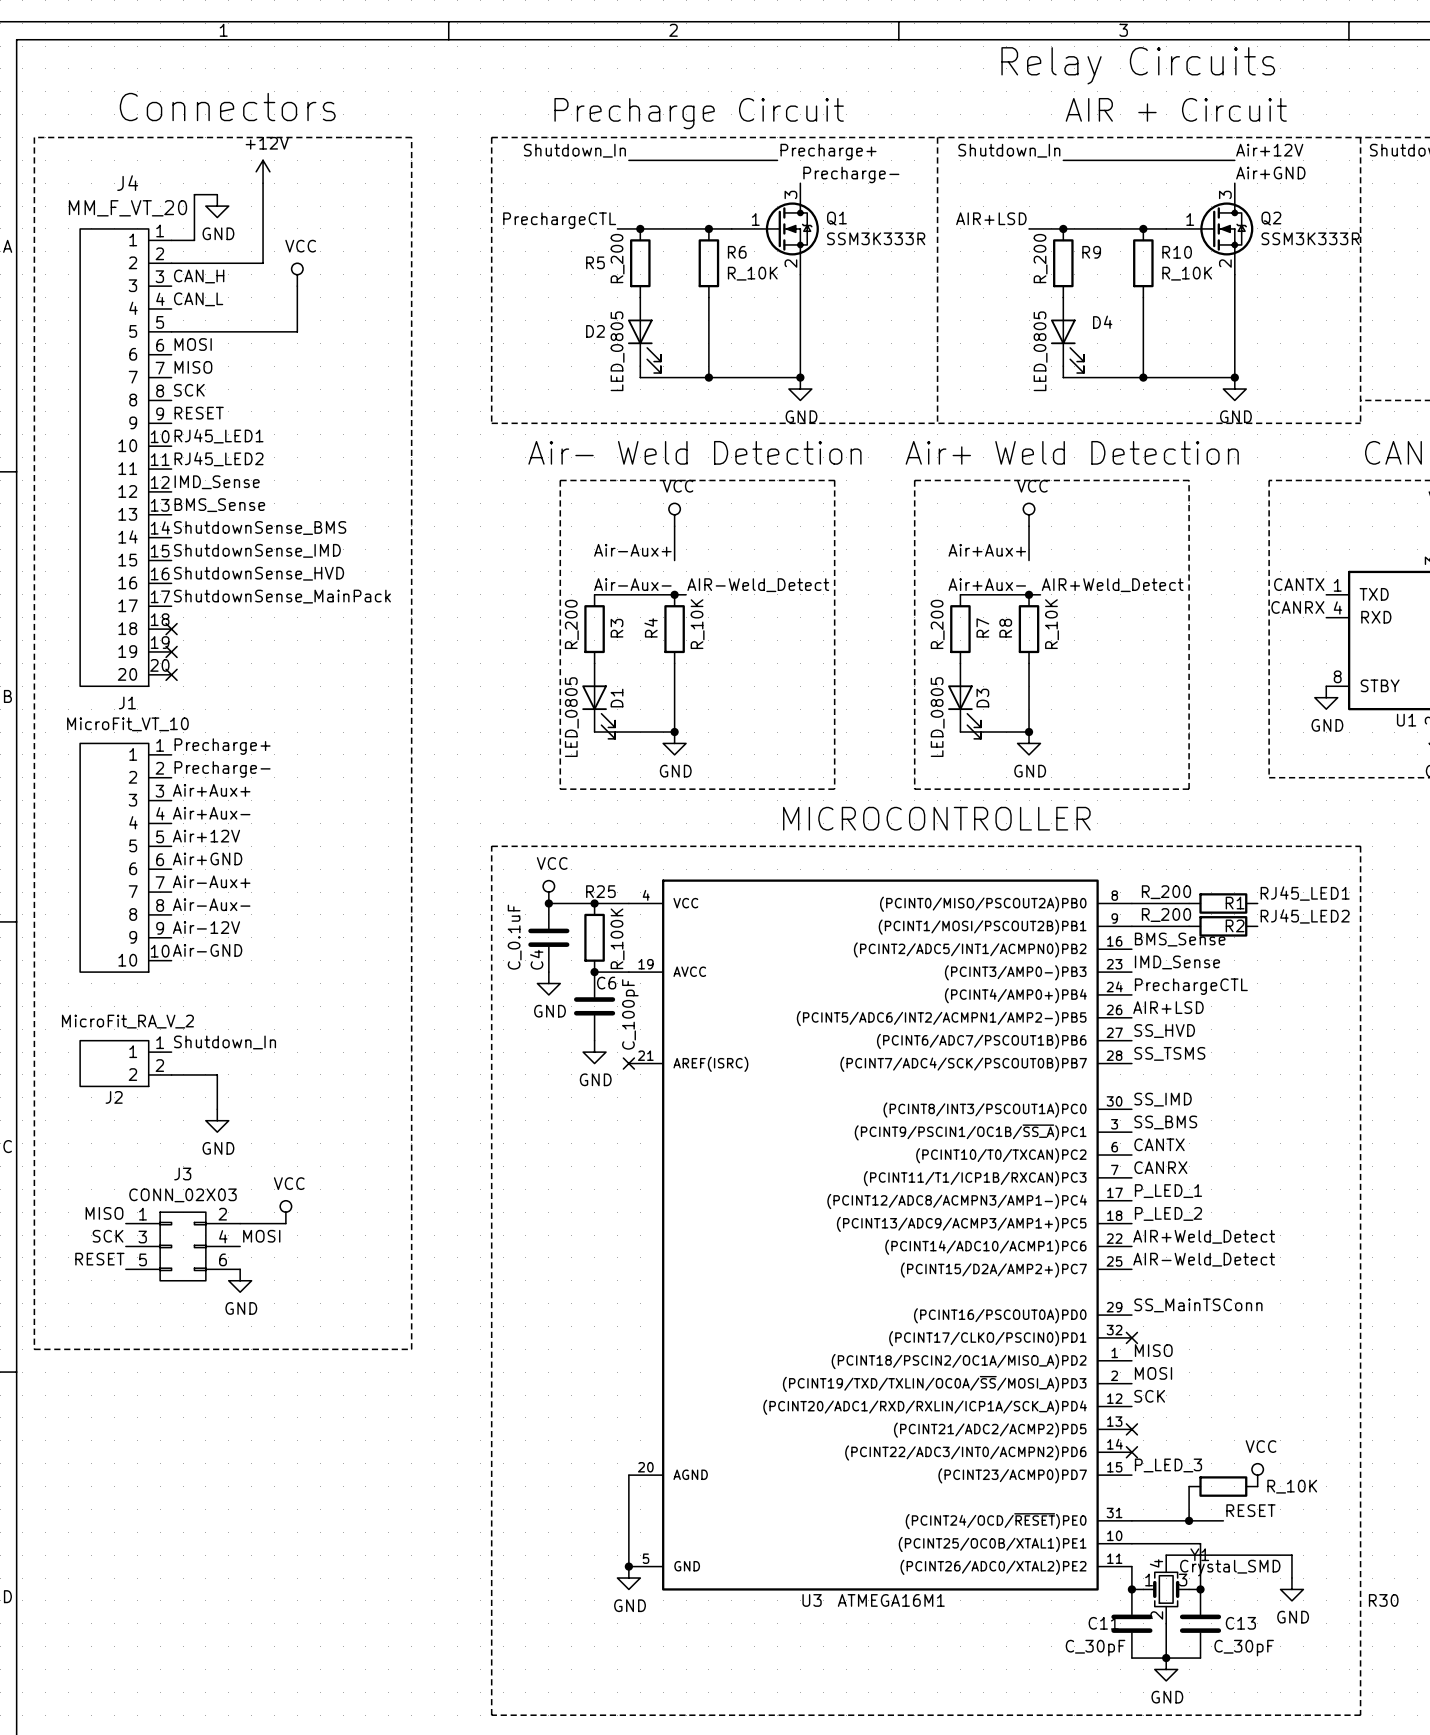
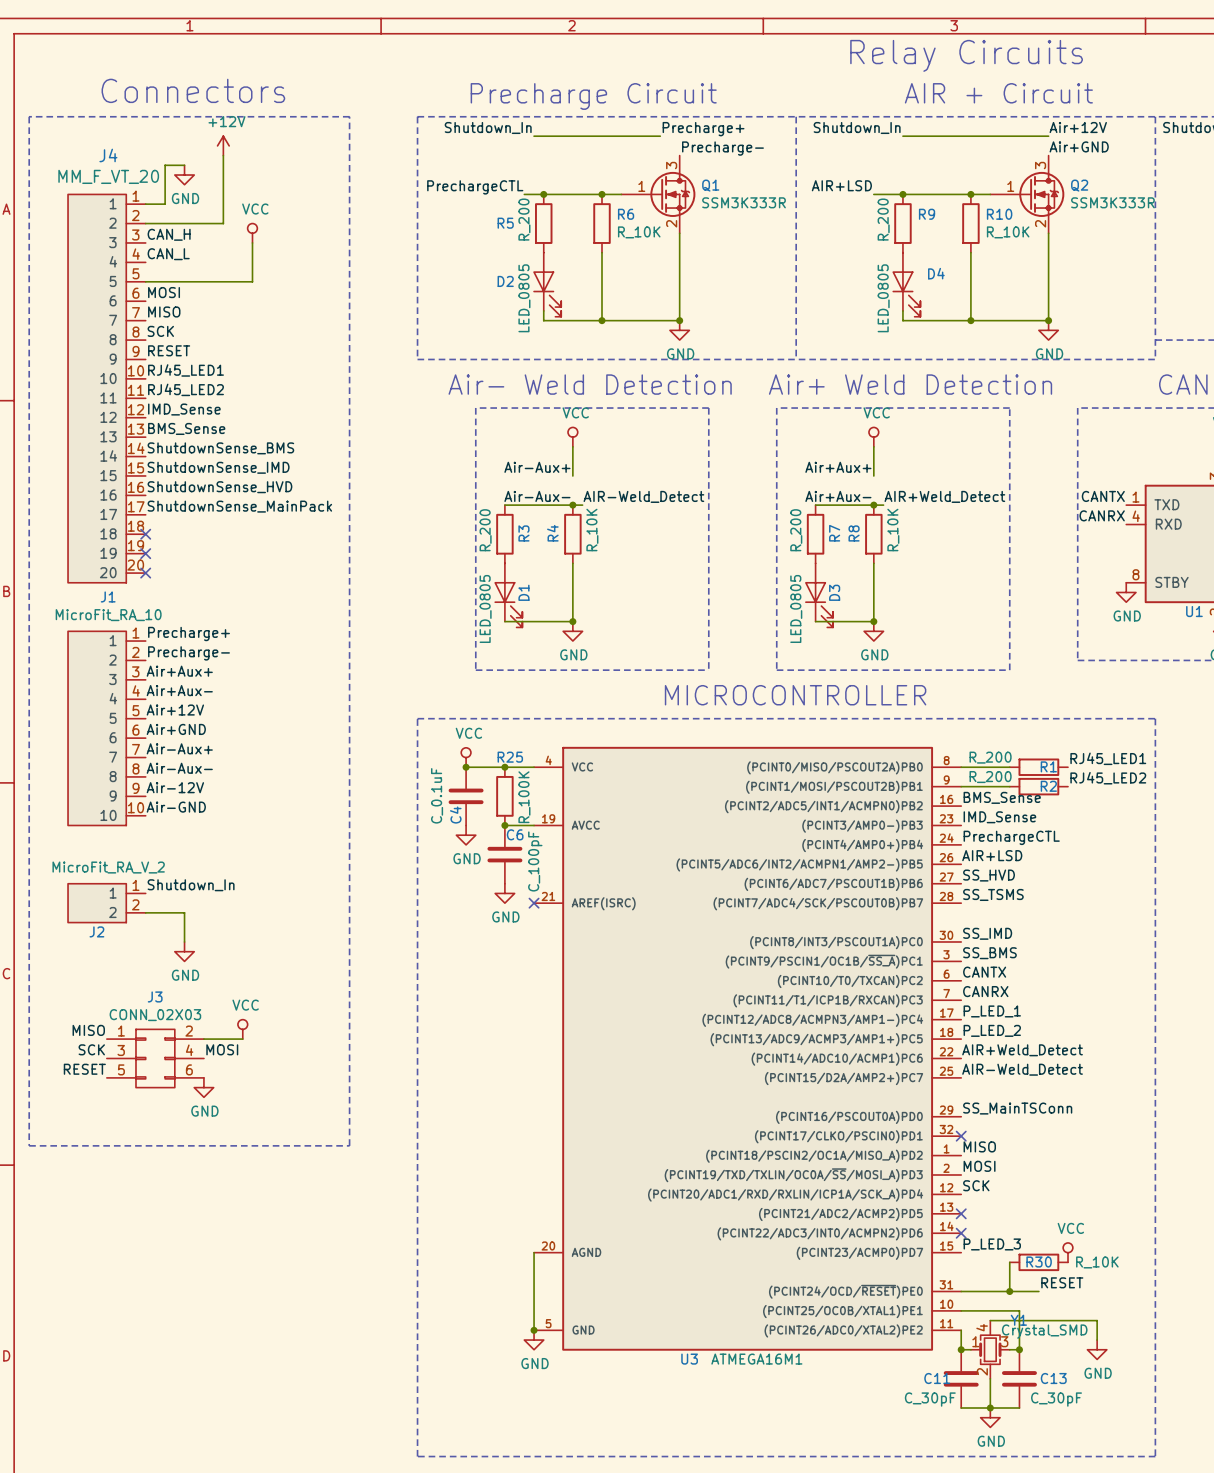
J1 value: MicroFit_VT_10 (127, 724) -> MicroFit_RA_10 (108, 615)
R30 name position: R30 (1383, 1600) -> R30 (1039, 1262)

